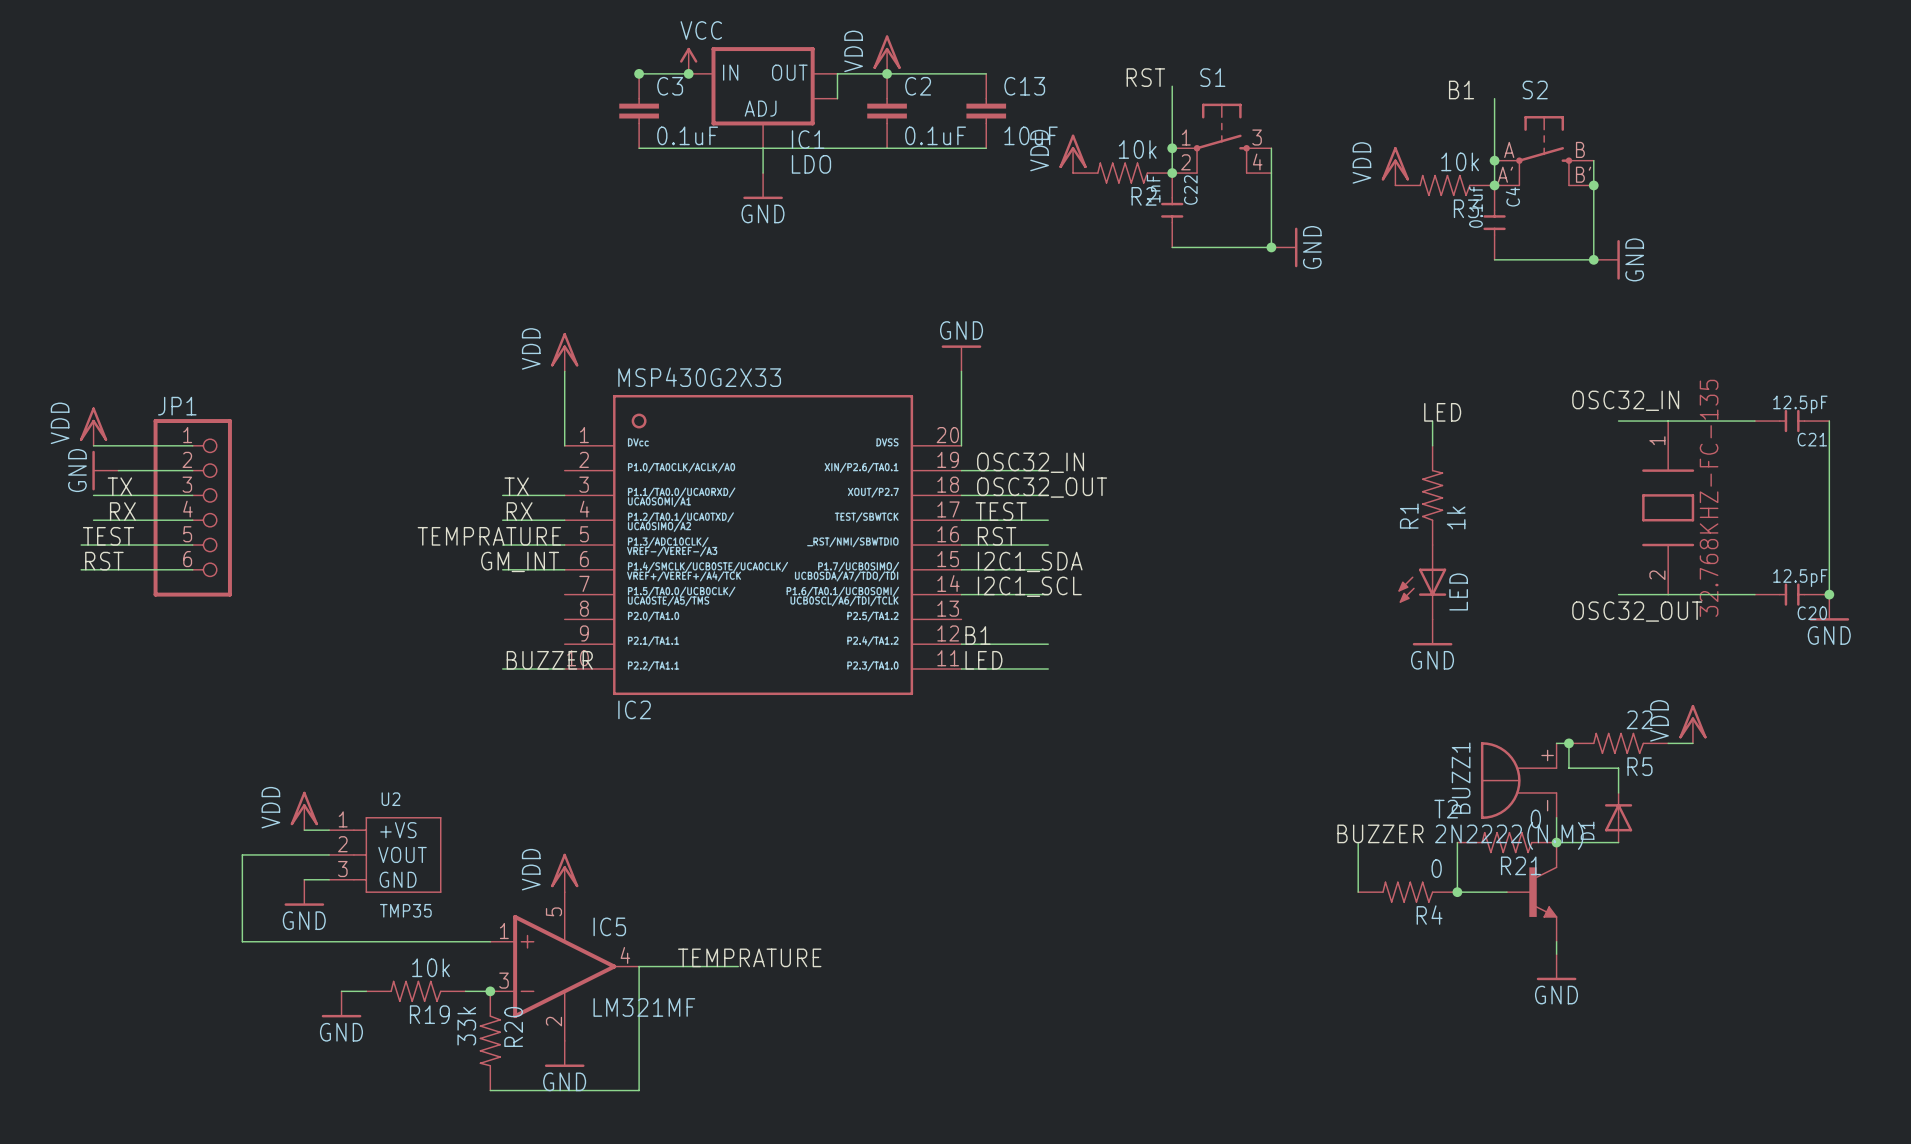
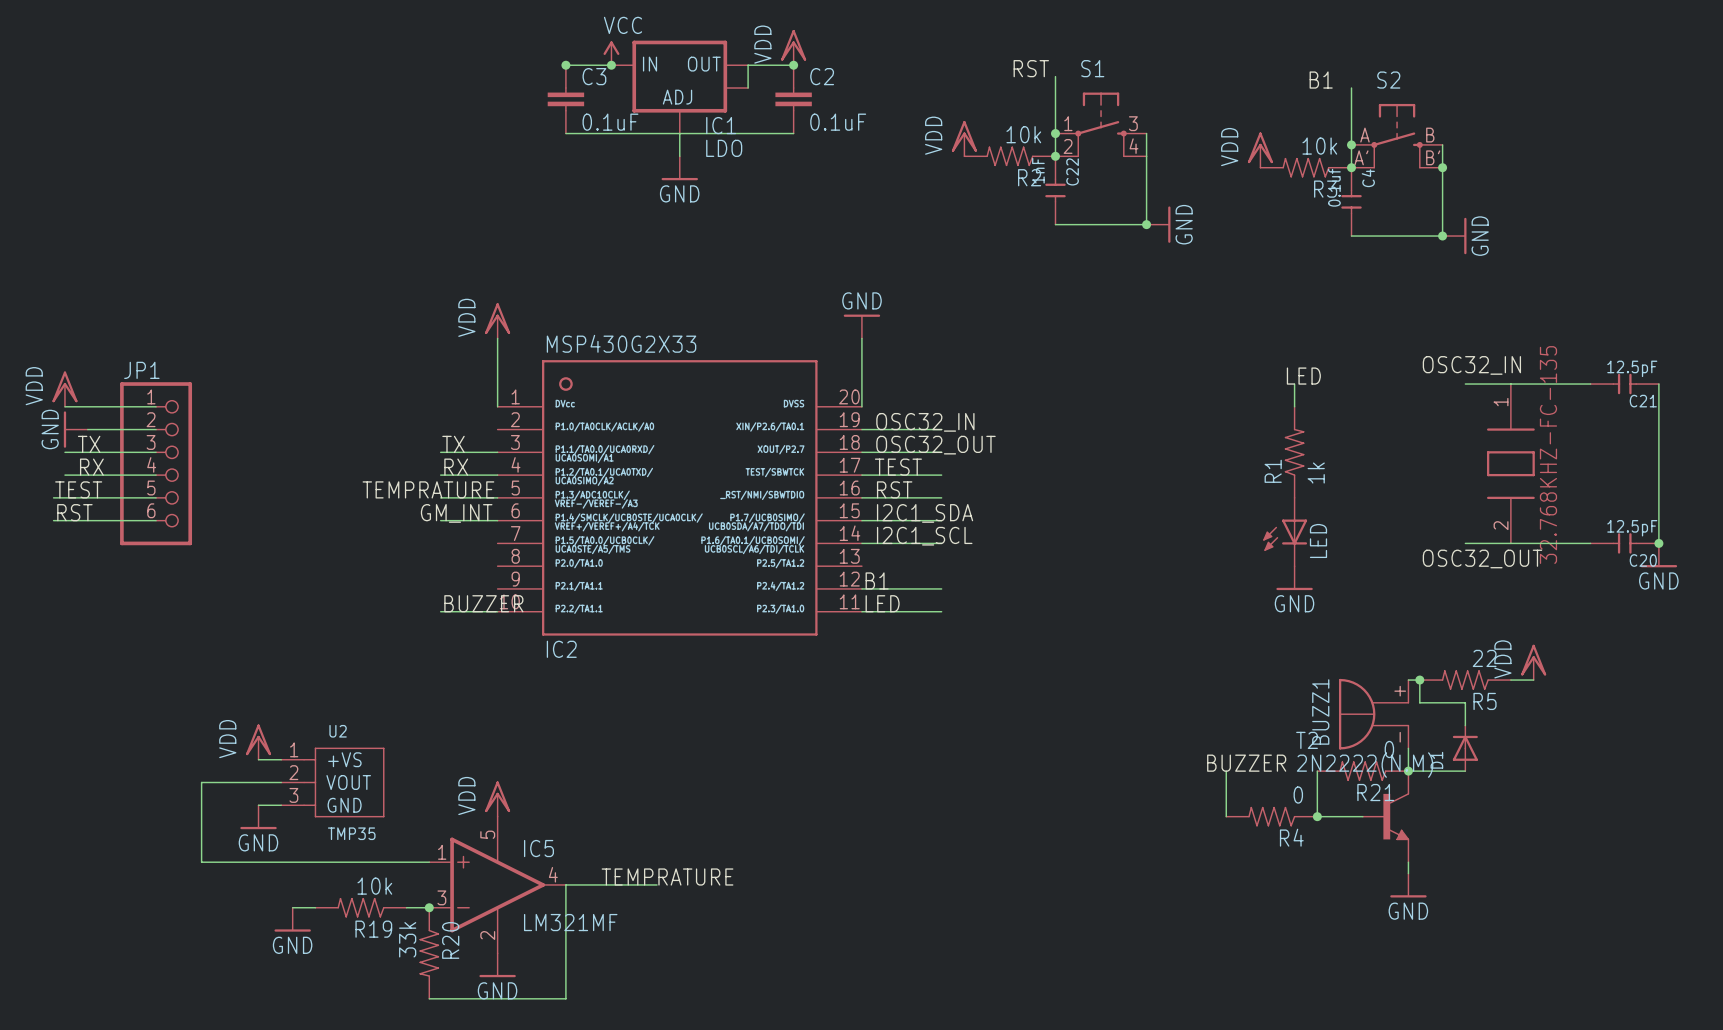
wire: (887, 73) (986, 73) -> none
C13: 10uF (986, 111) -> none
wire: (887, 148) (986, 148) -> none

